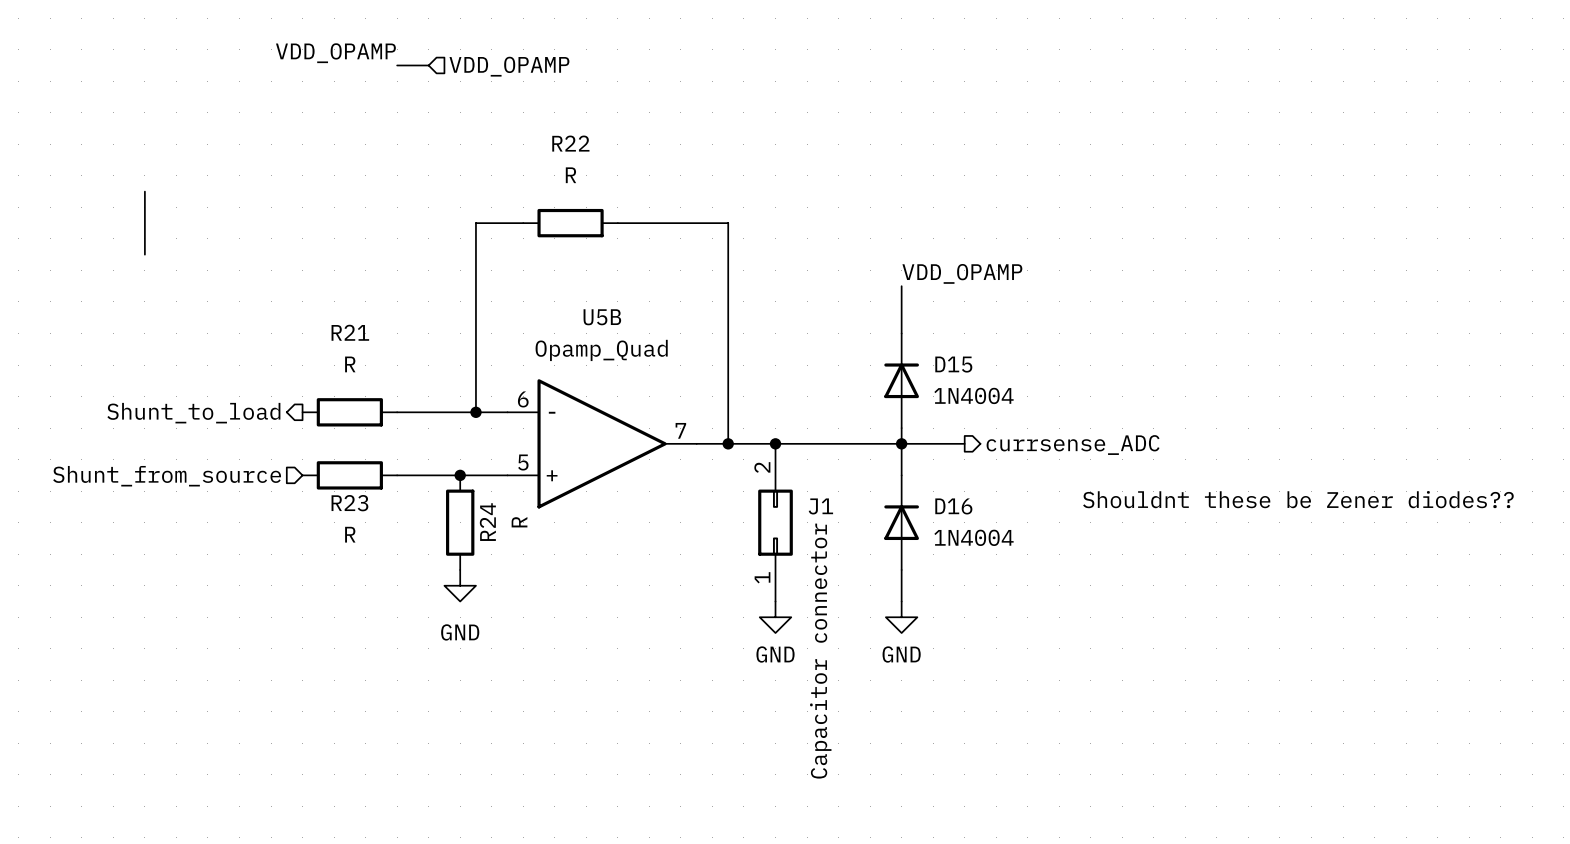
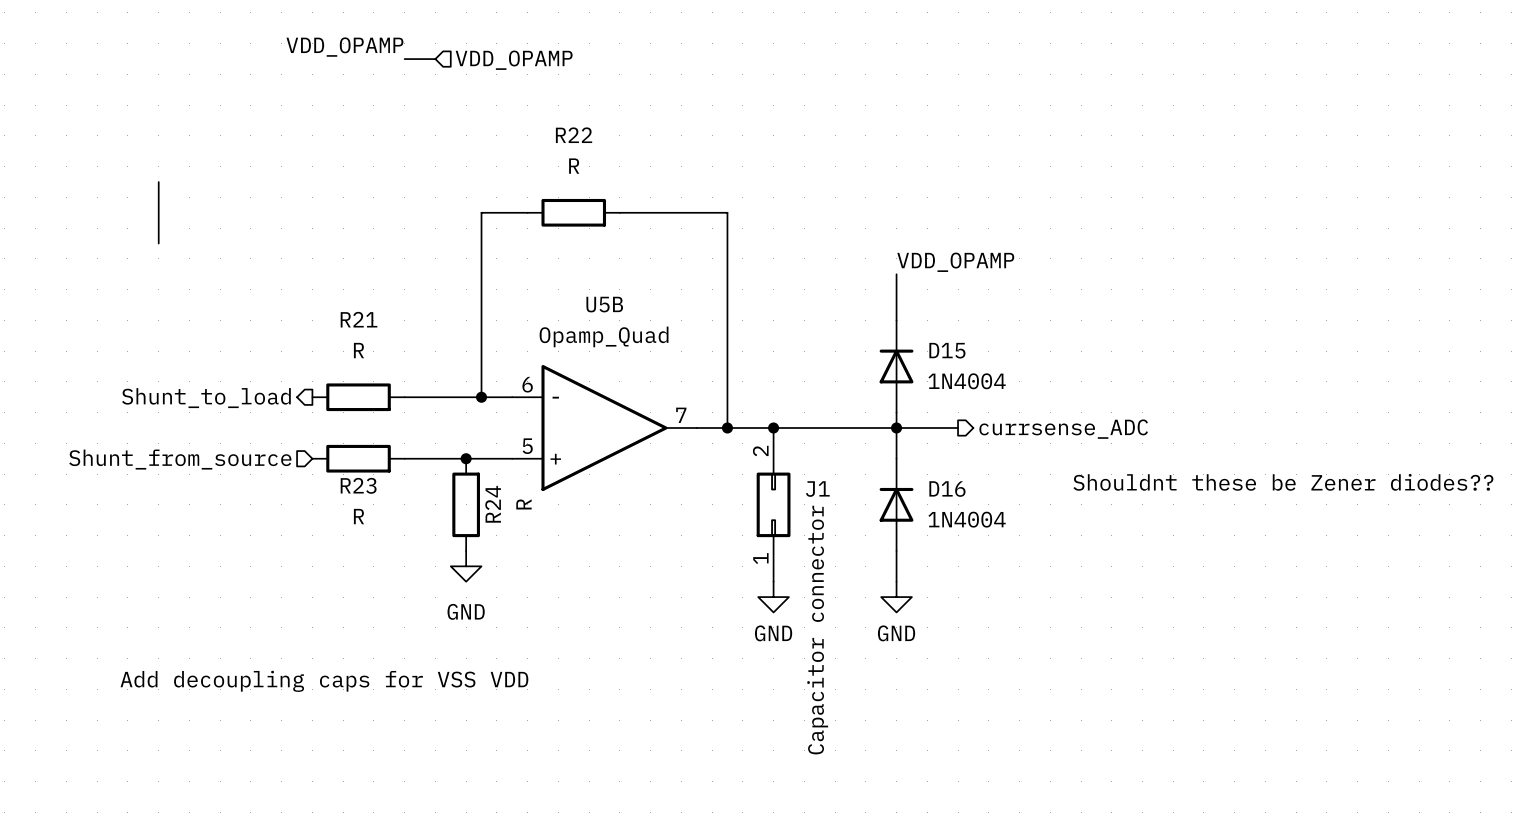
text: none -> Add decoupling caps for VSS VDD (324, 681)

